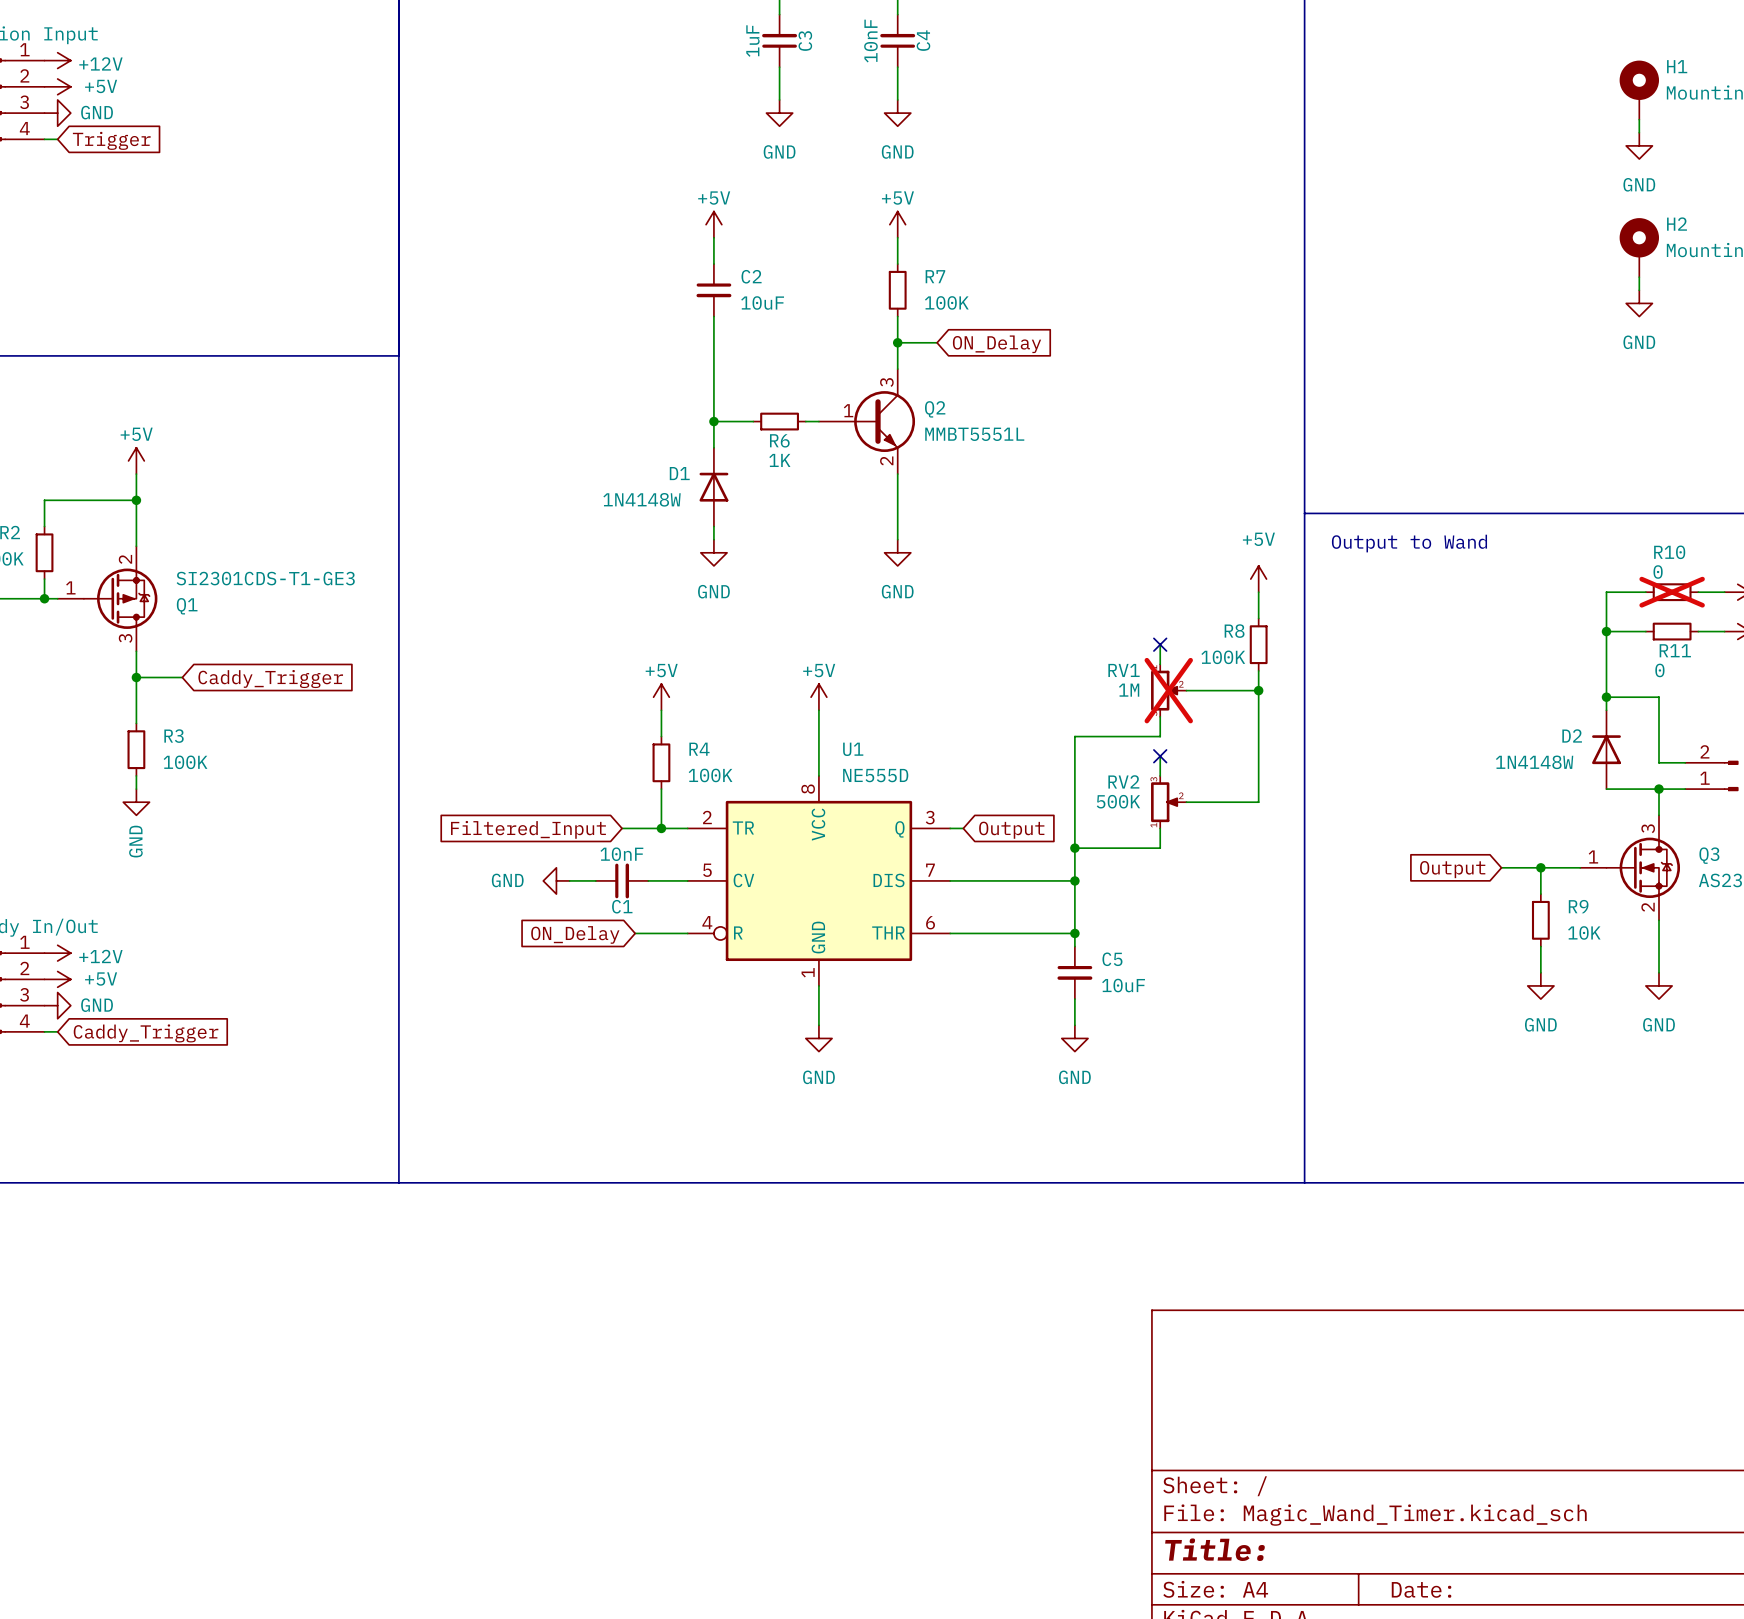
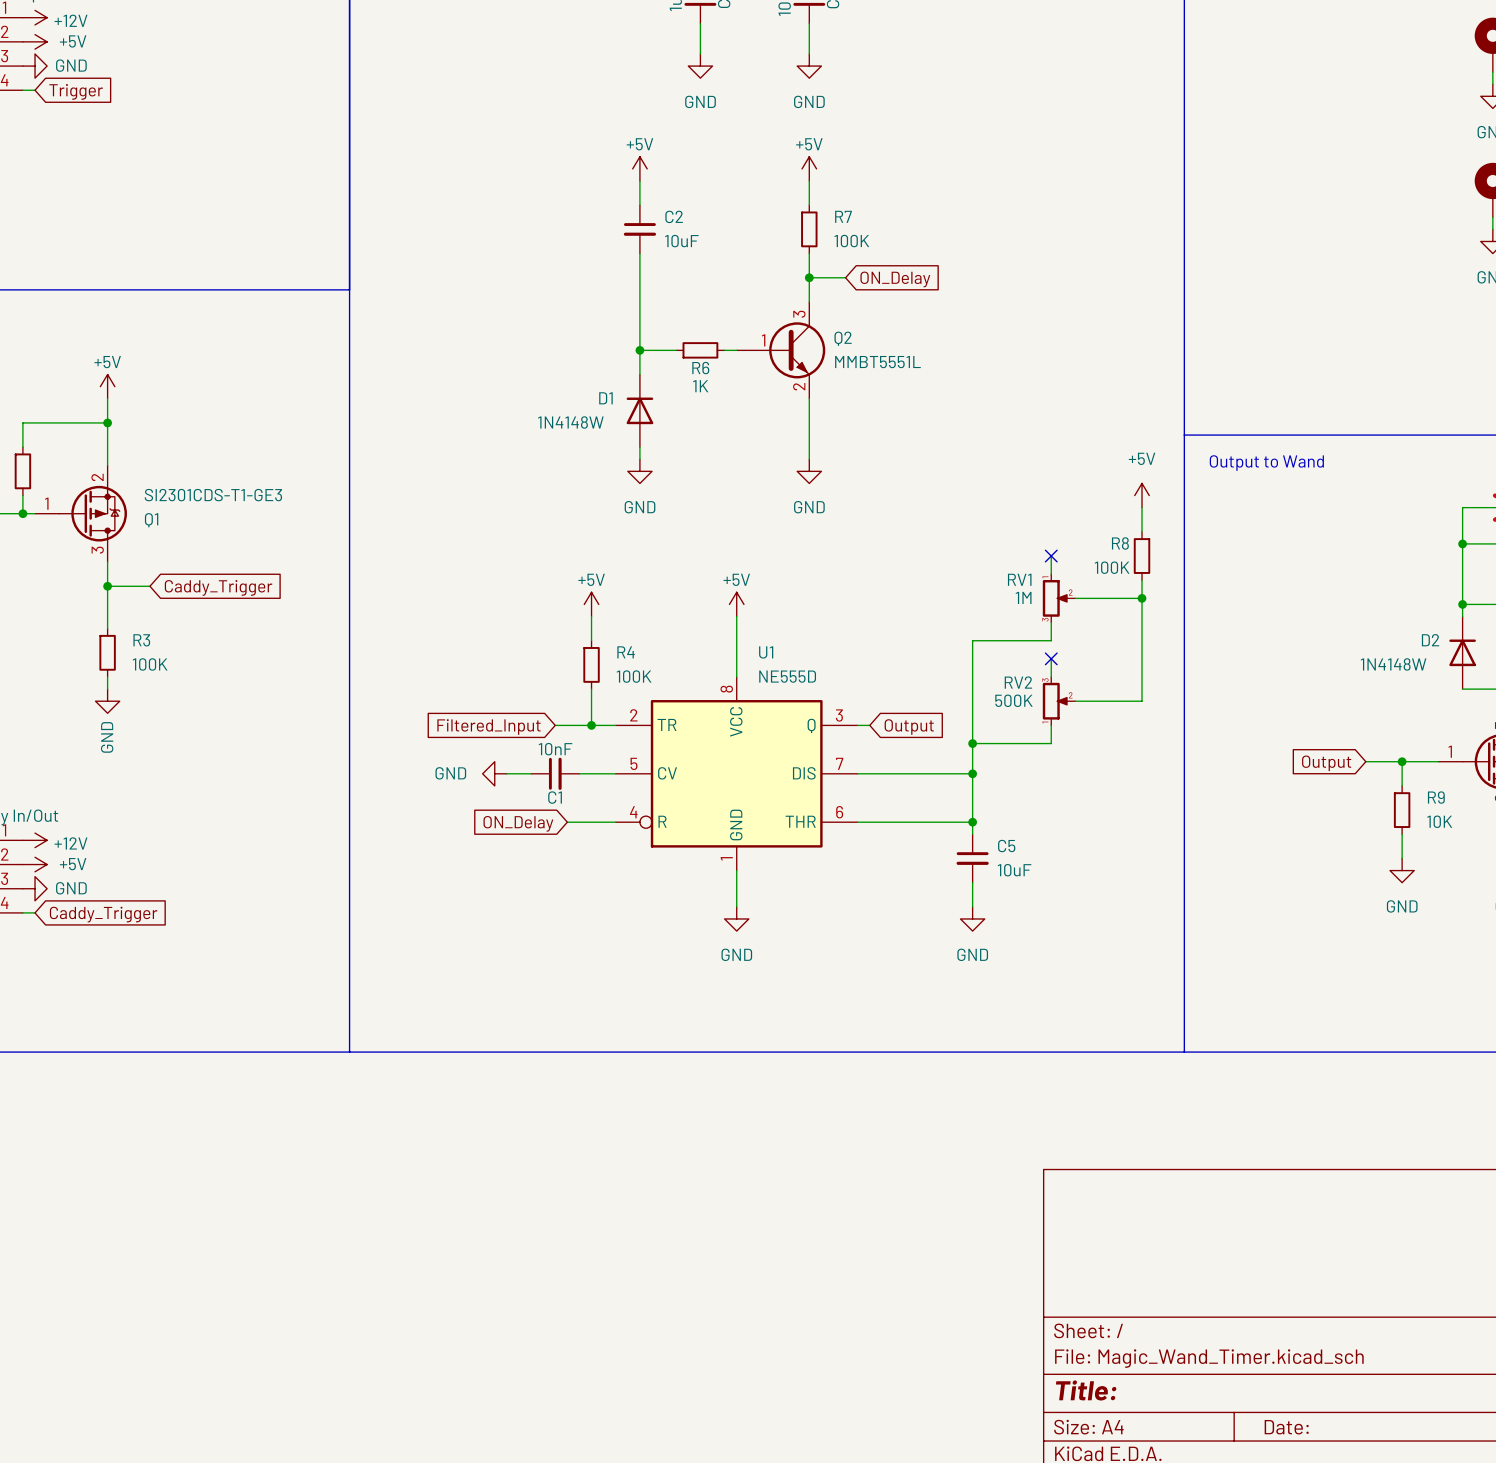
RV1 do-not-place cross: (1168, 690) -> none

